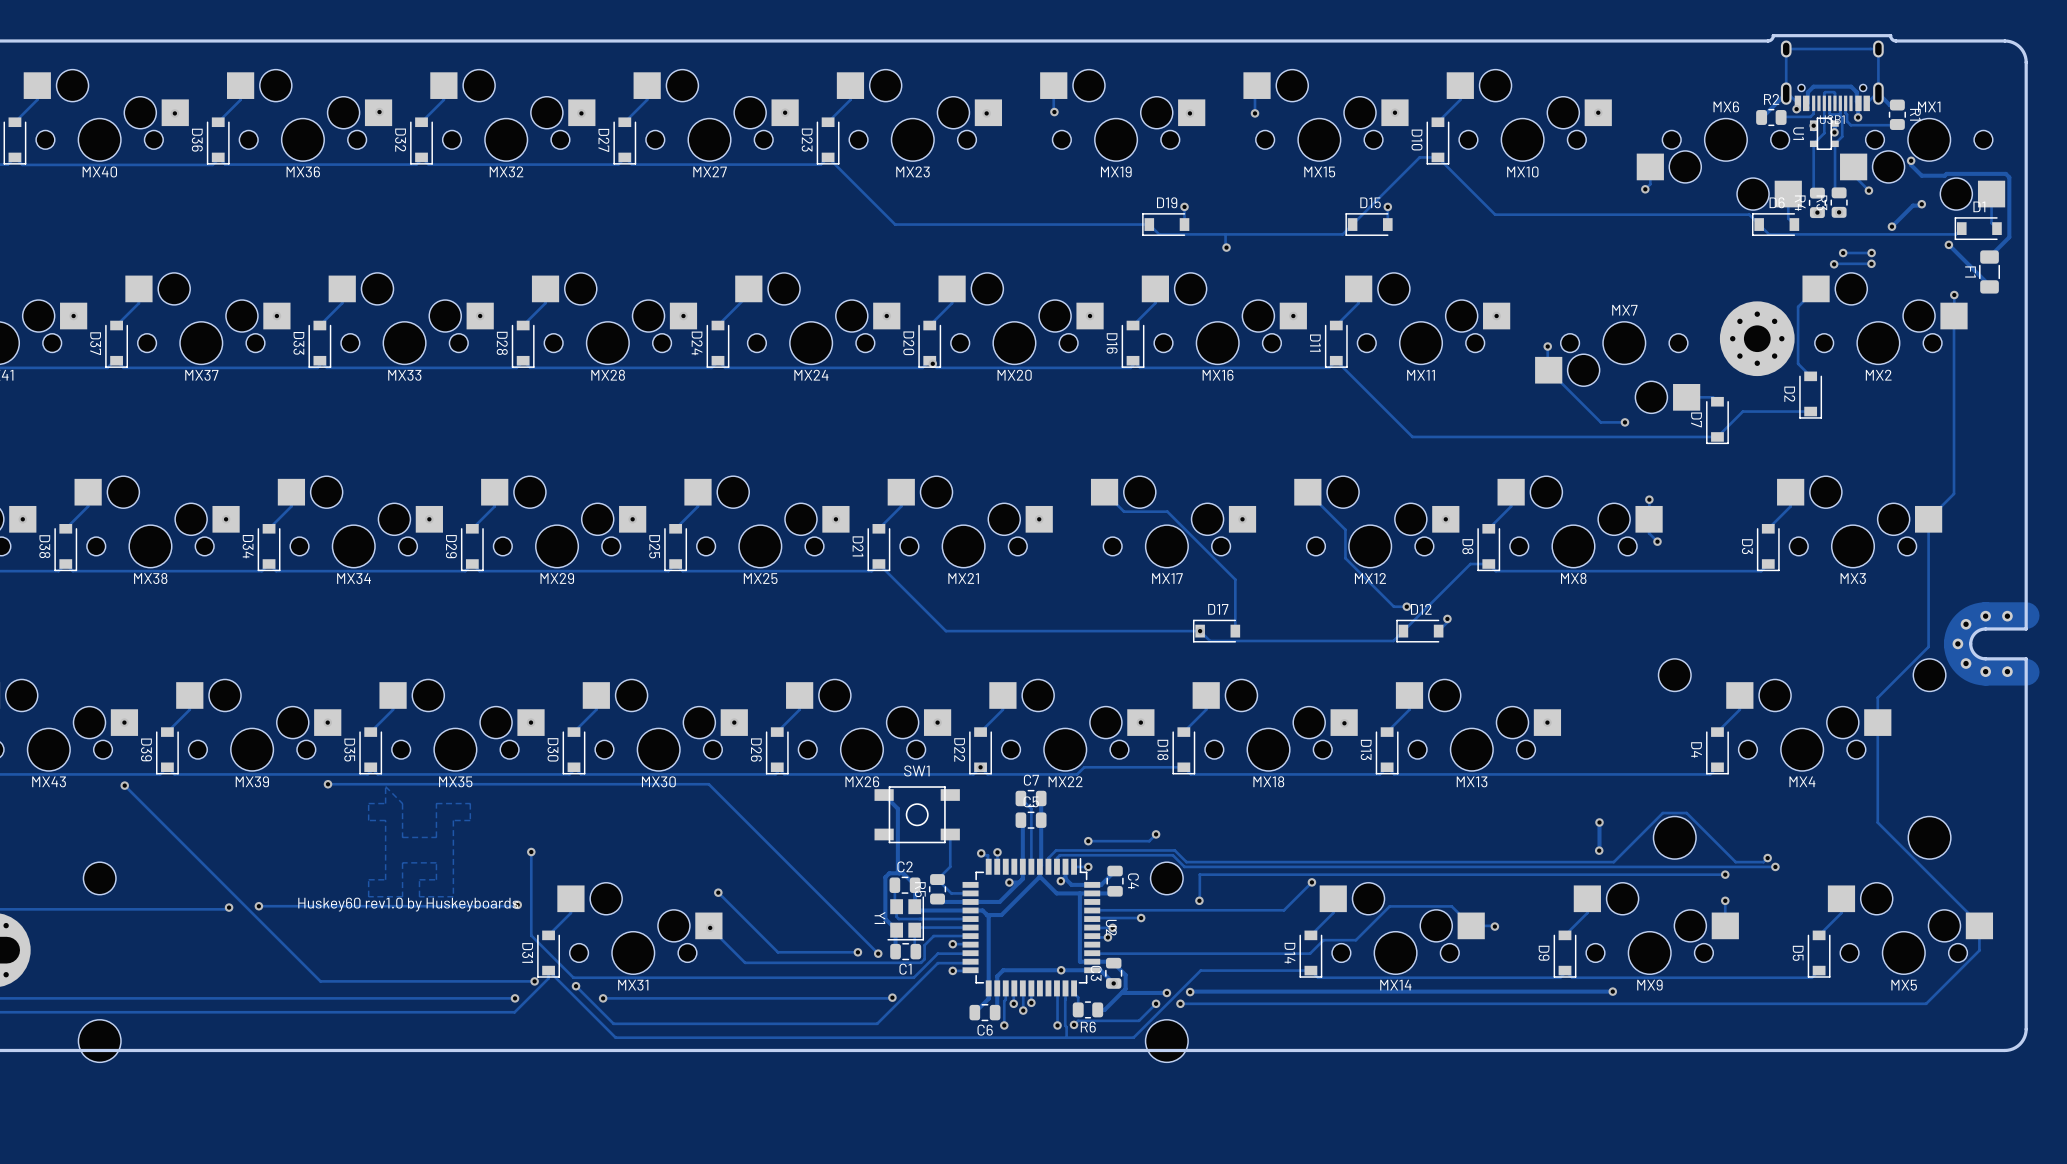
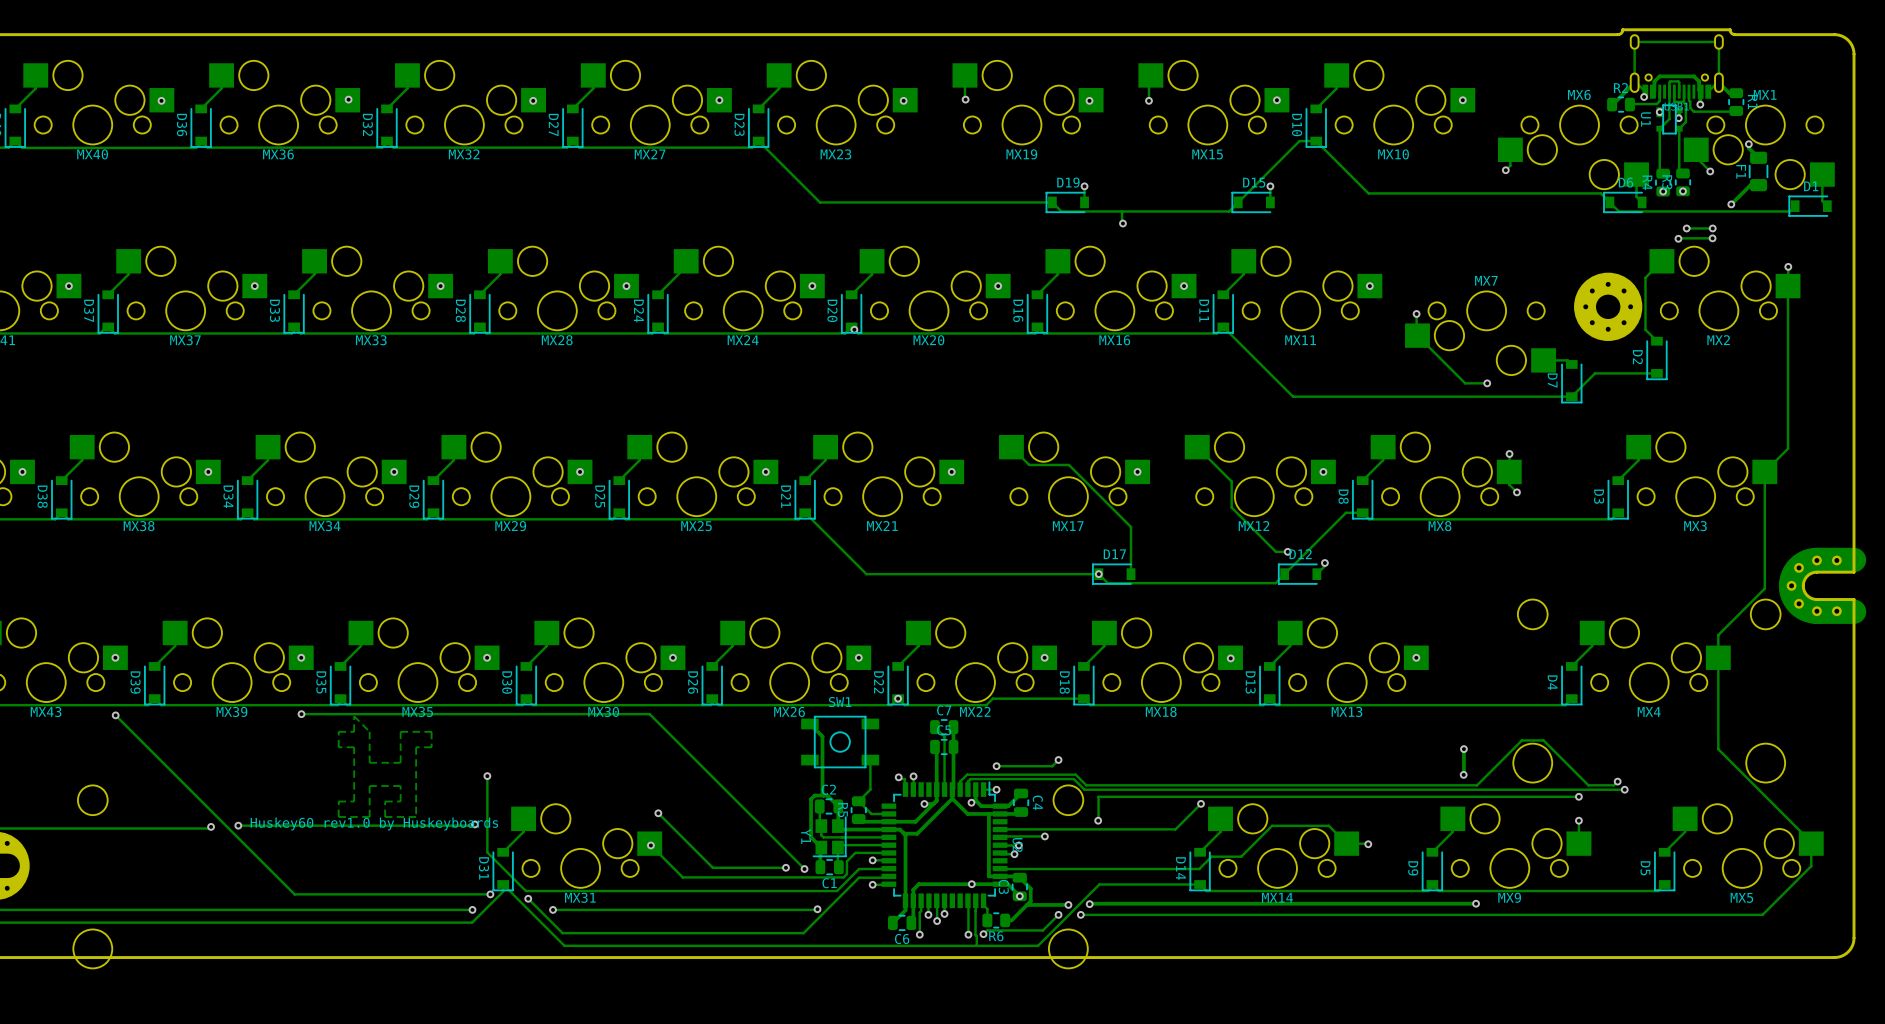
track: (1921, 175) (2005, 173) (2009, 177) (2009, 237) (1989, 257) -> none
via: (1921, 204) -> none
track: (1948, 244) (1989, 286) -> none
via: (1948, 244) -> none
F1 position: (1989, 271) -> (1758, 171)

